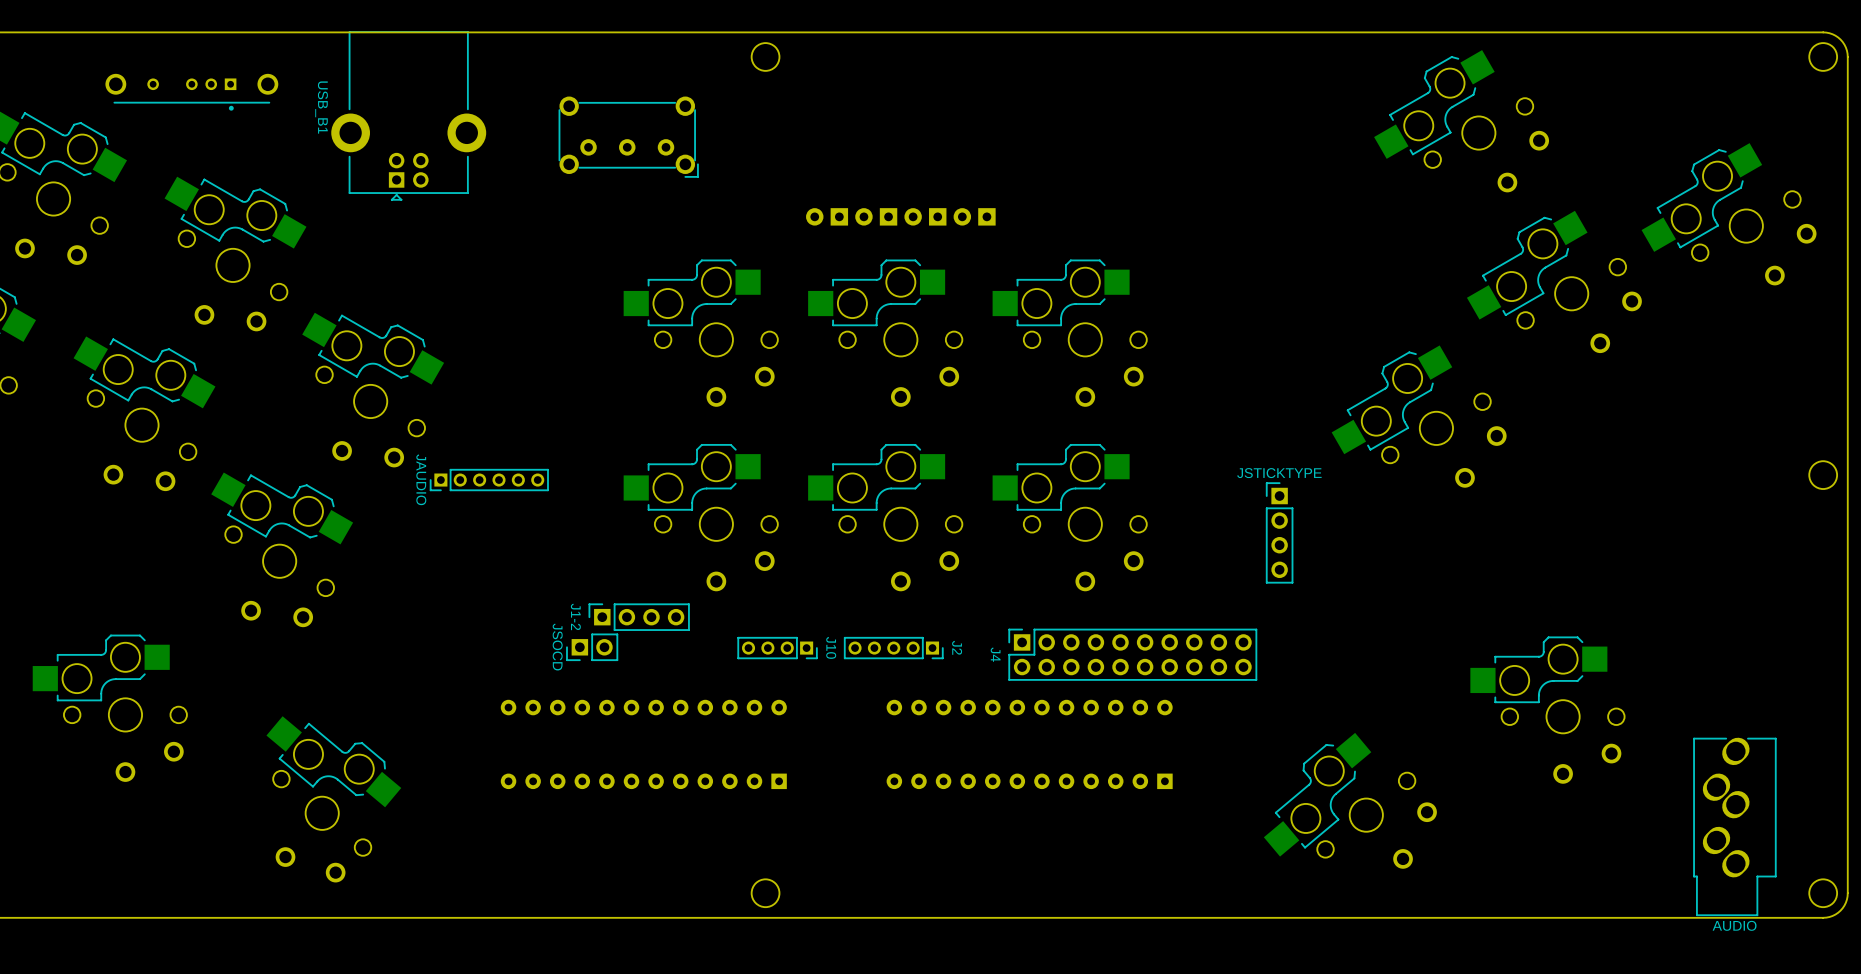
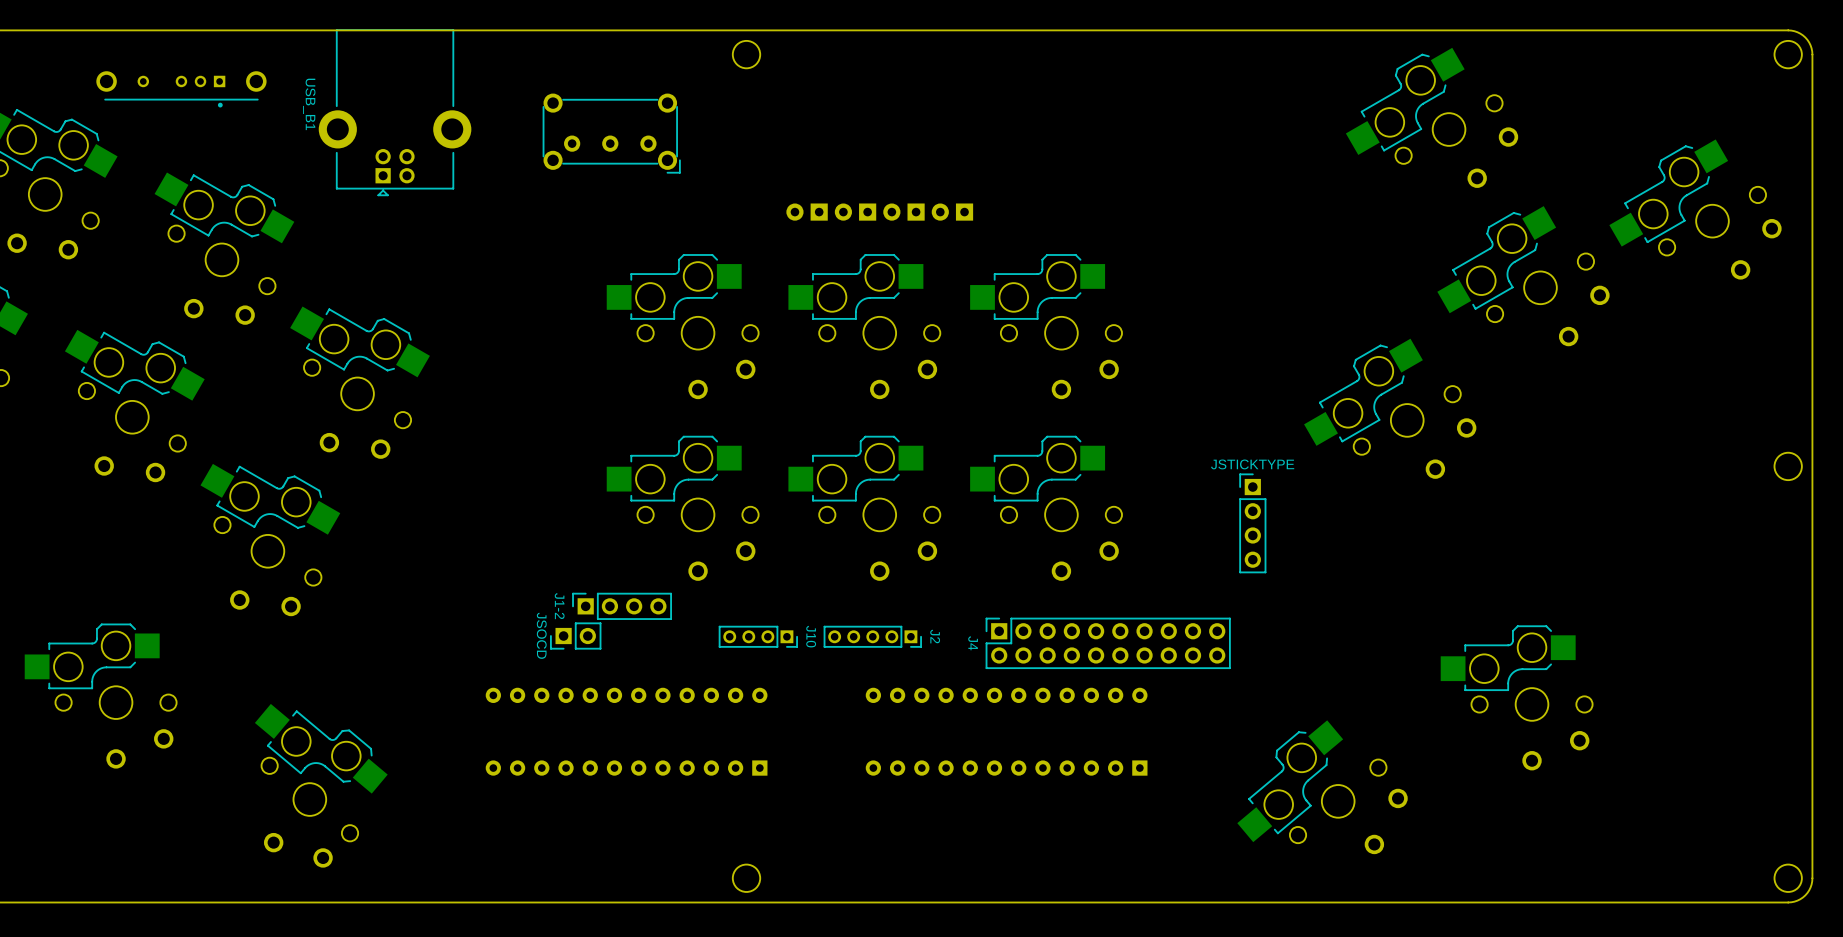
JAUDIO: (489, 480) -> none
AUDIO: (1734, 826) -> none

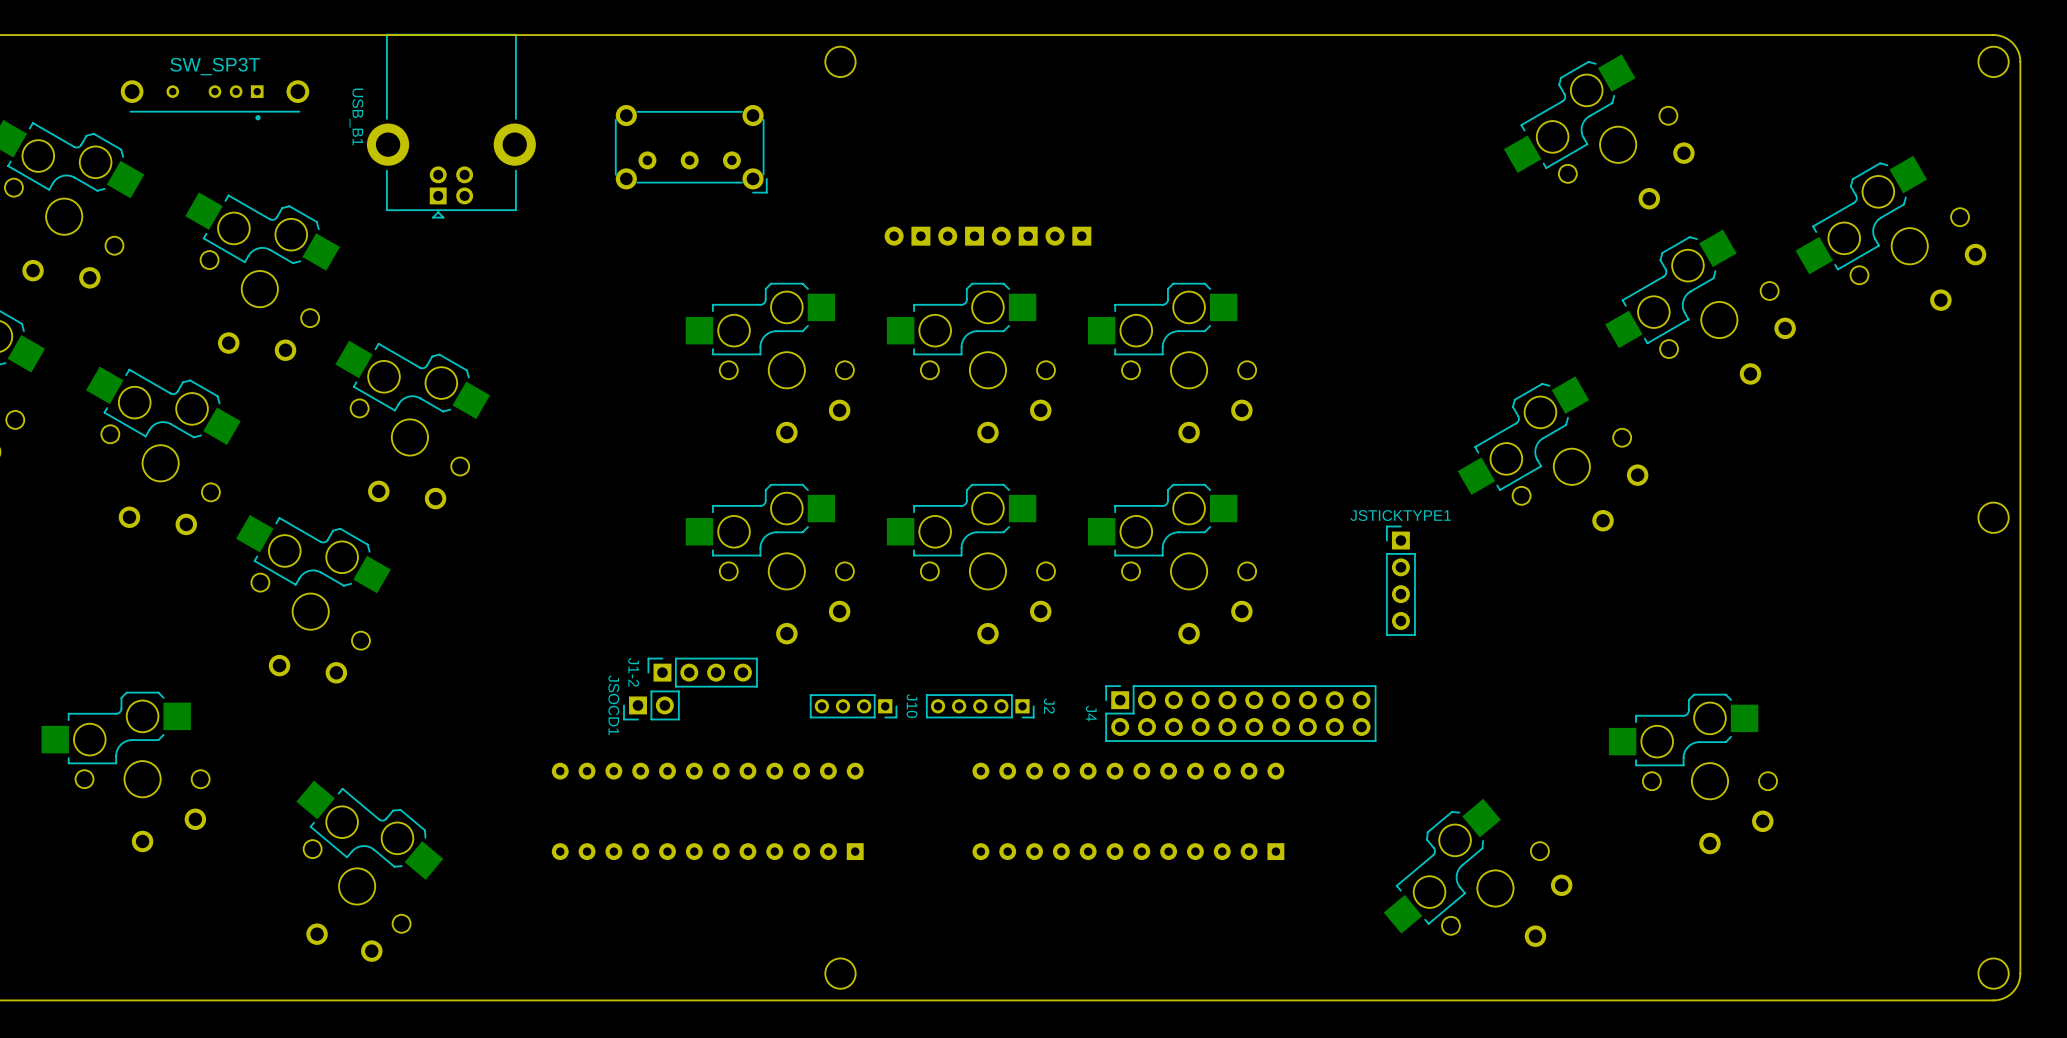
part value: none -> SW_SP3T (215, 66)
JSTICKTYPE name: JSTICKTYPE (1252, 464) -> JSTICKTYPE1 (1400, 515)
JSOCD name: JSOCD (541, 635) -> JSOCD1 (613, 705)

